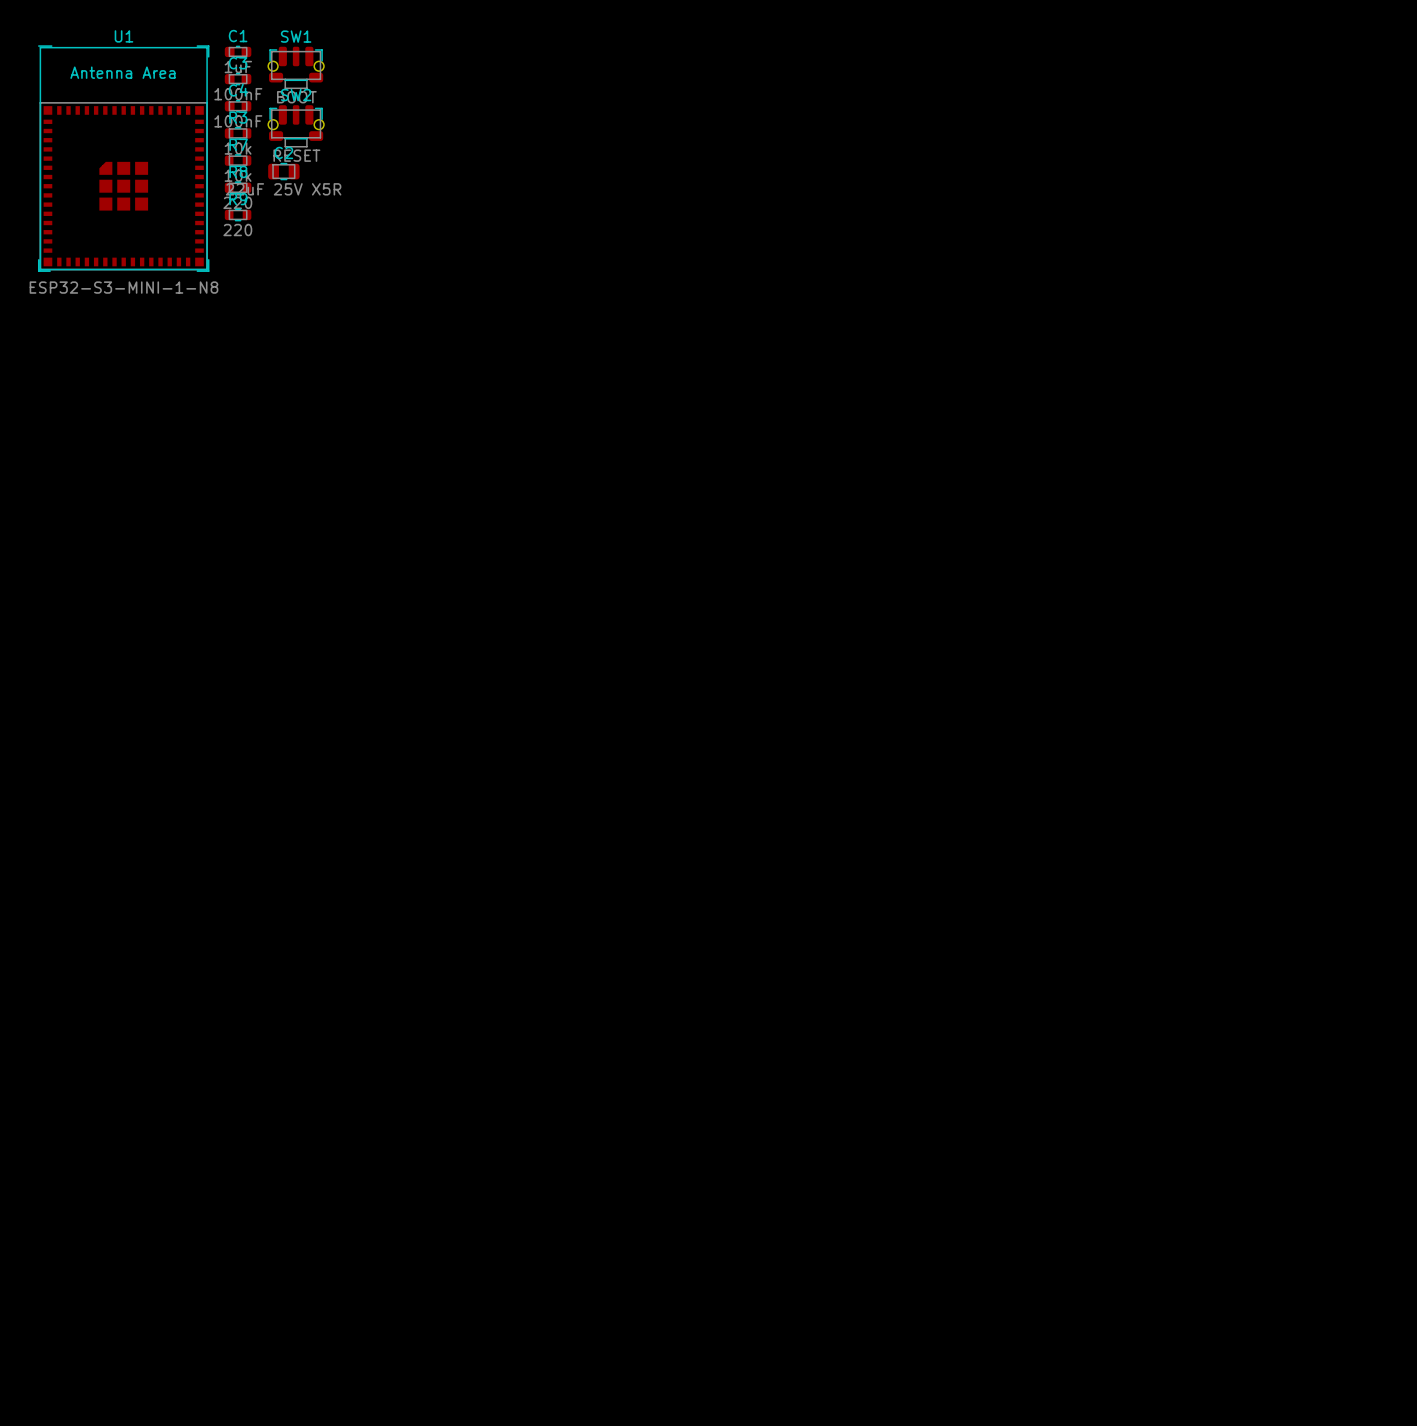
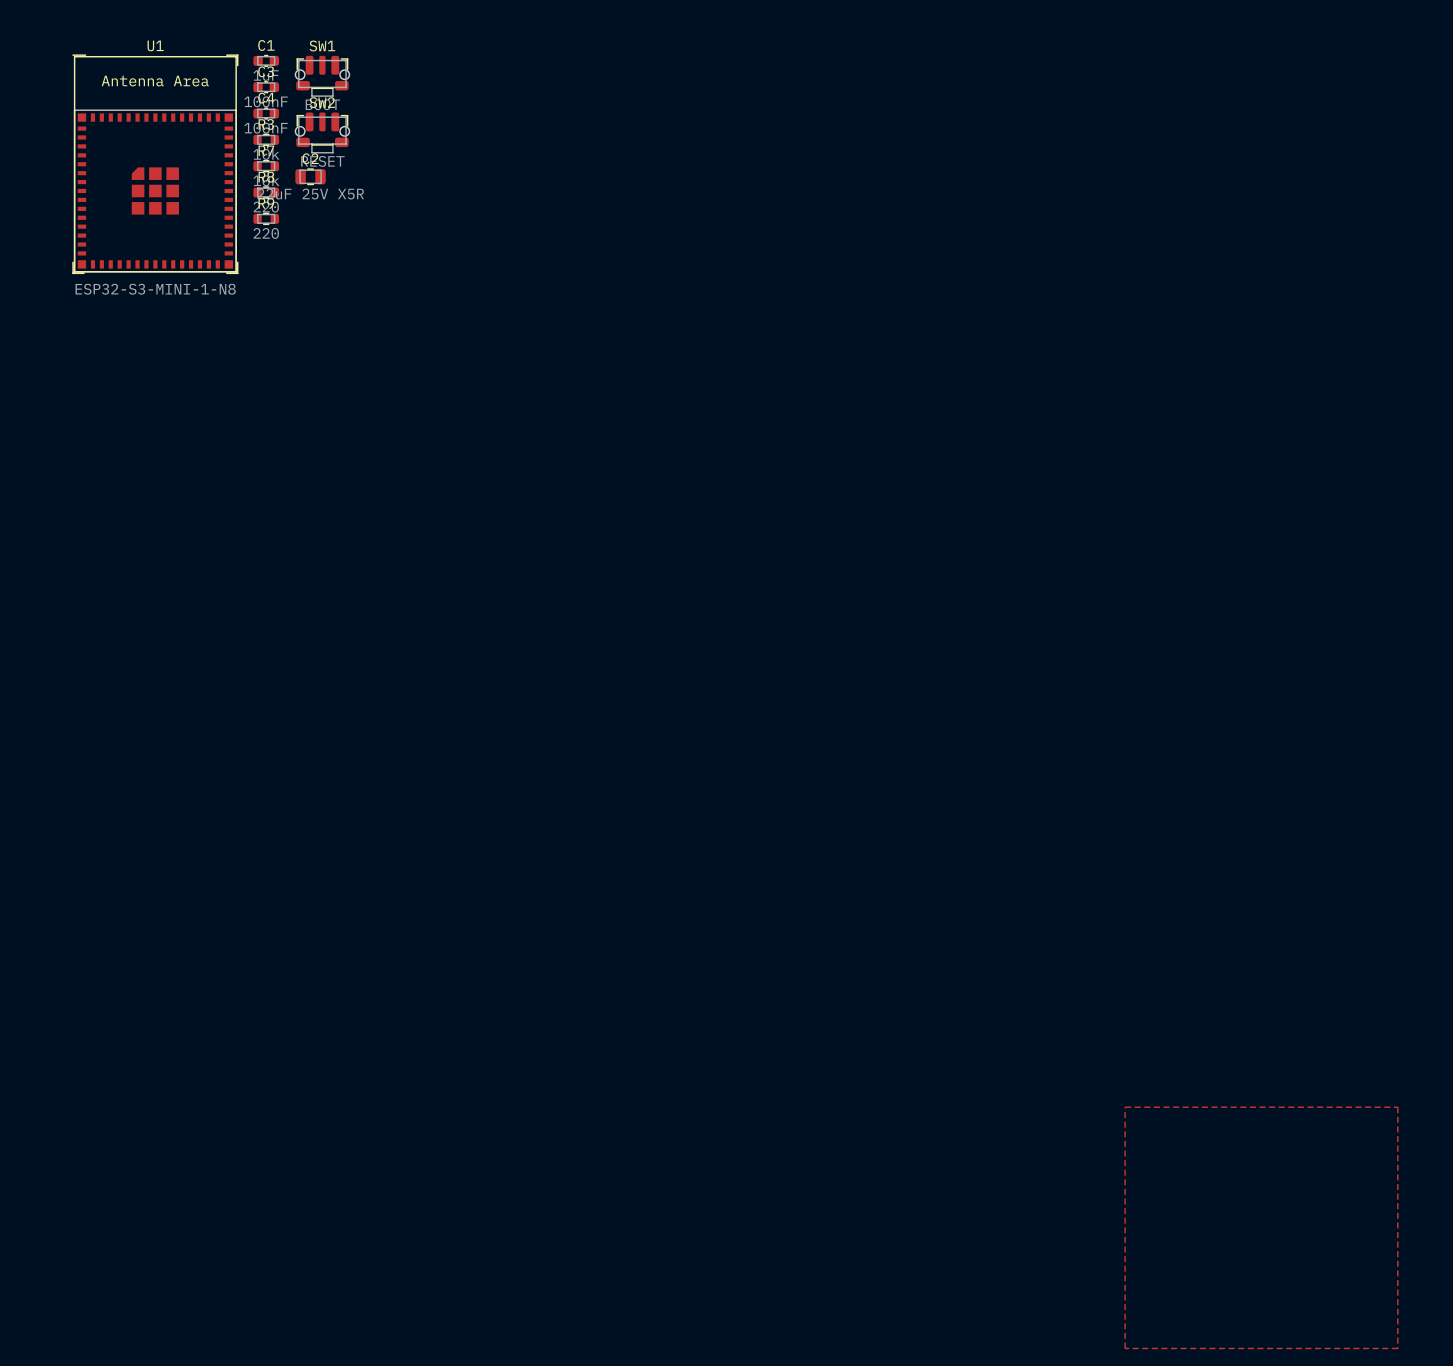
zone outline: none -> (1125, 1107) (1397, 1107) (1397, 1348) (1125, 1348) (1125, 1107)

